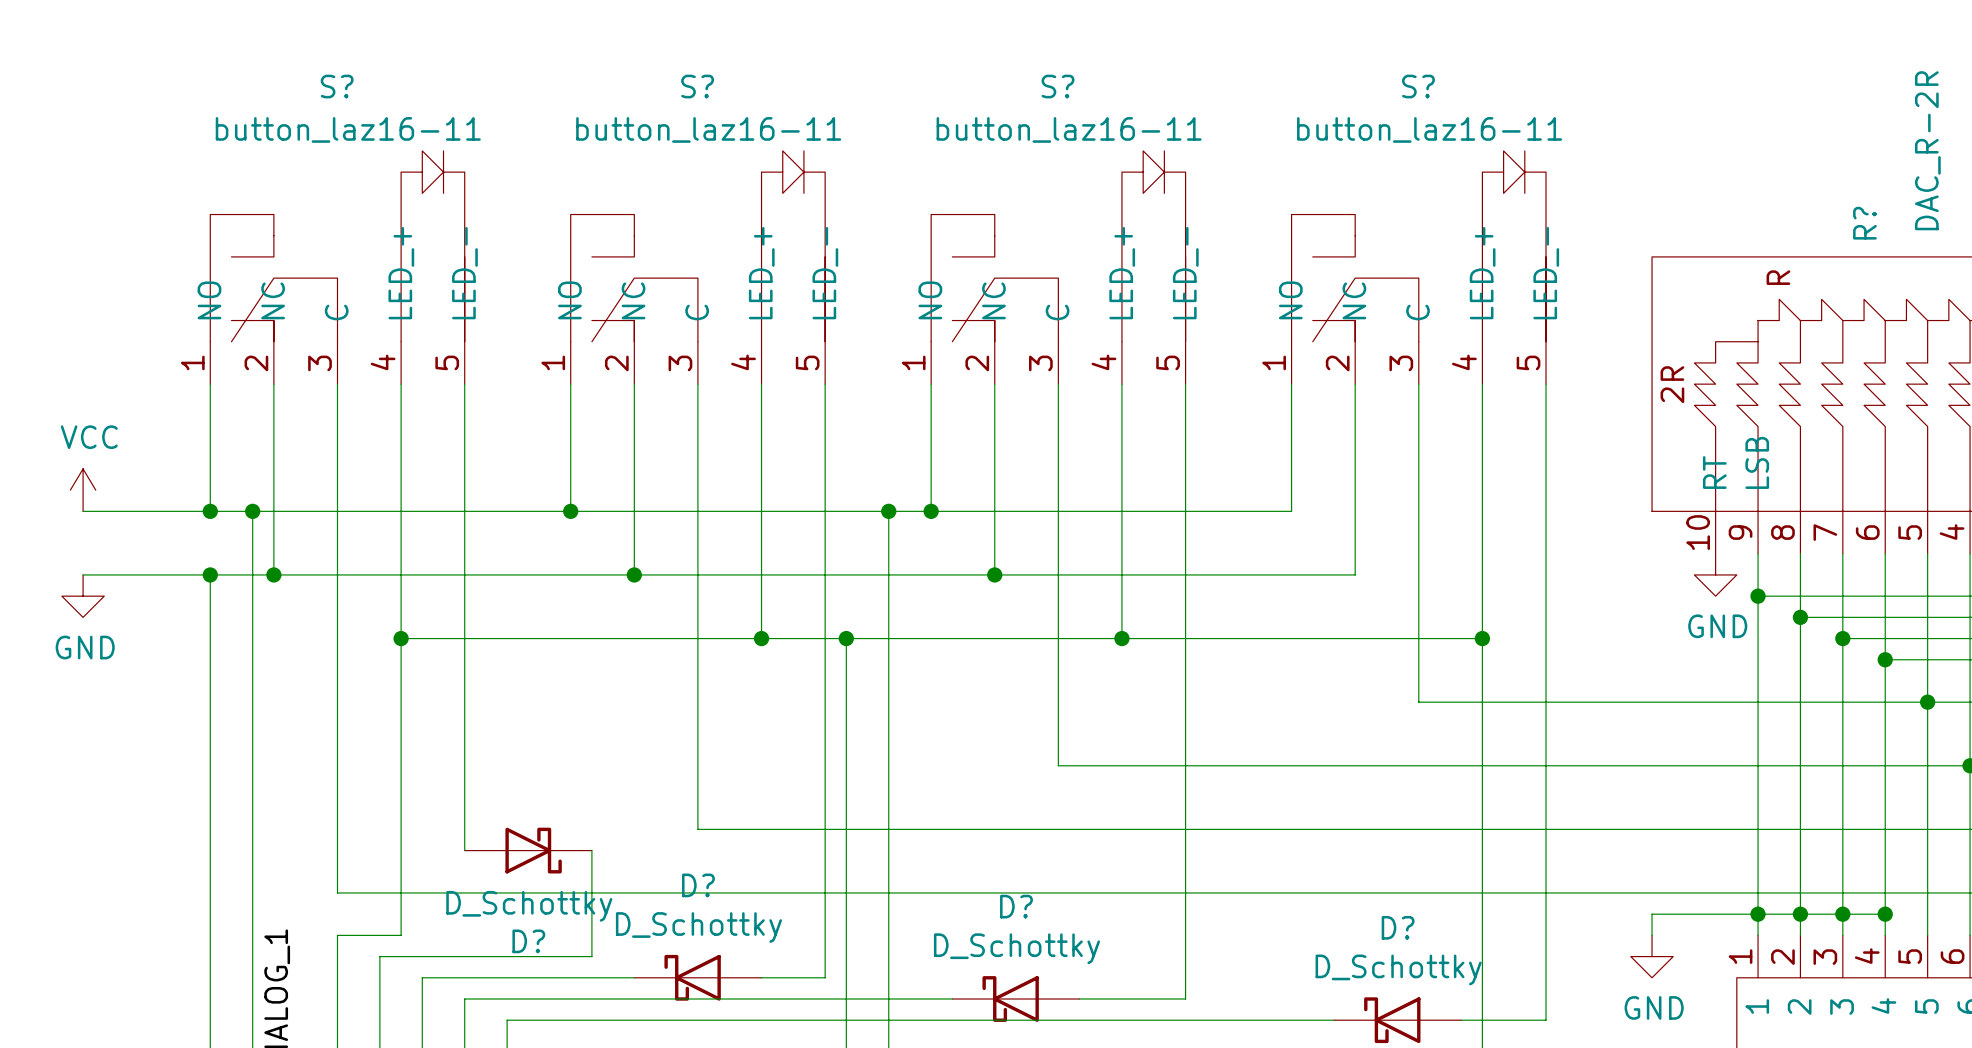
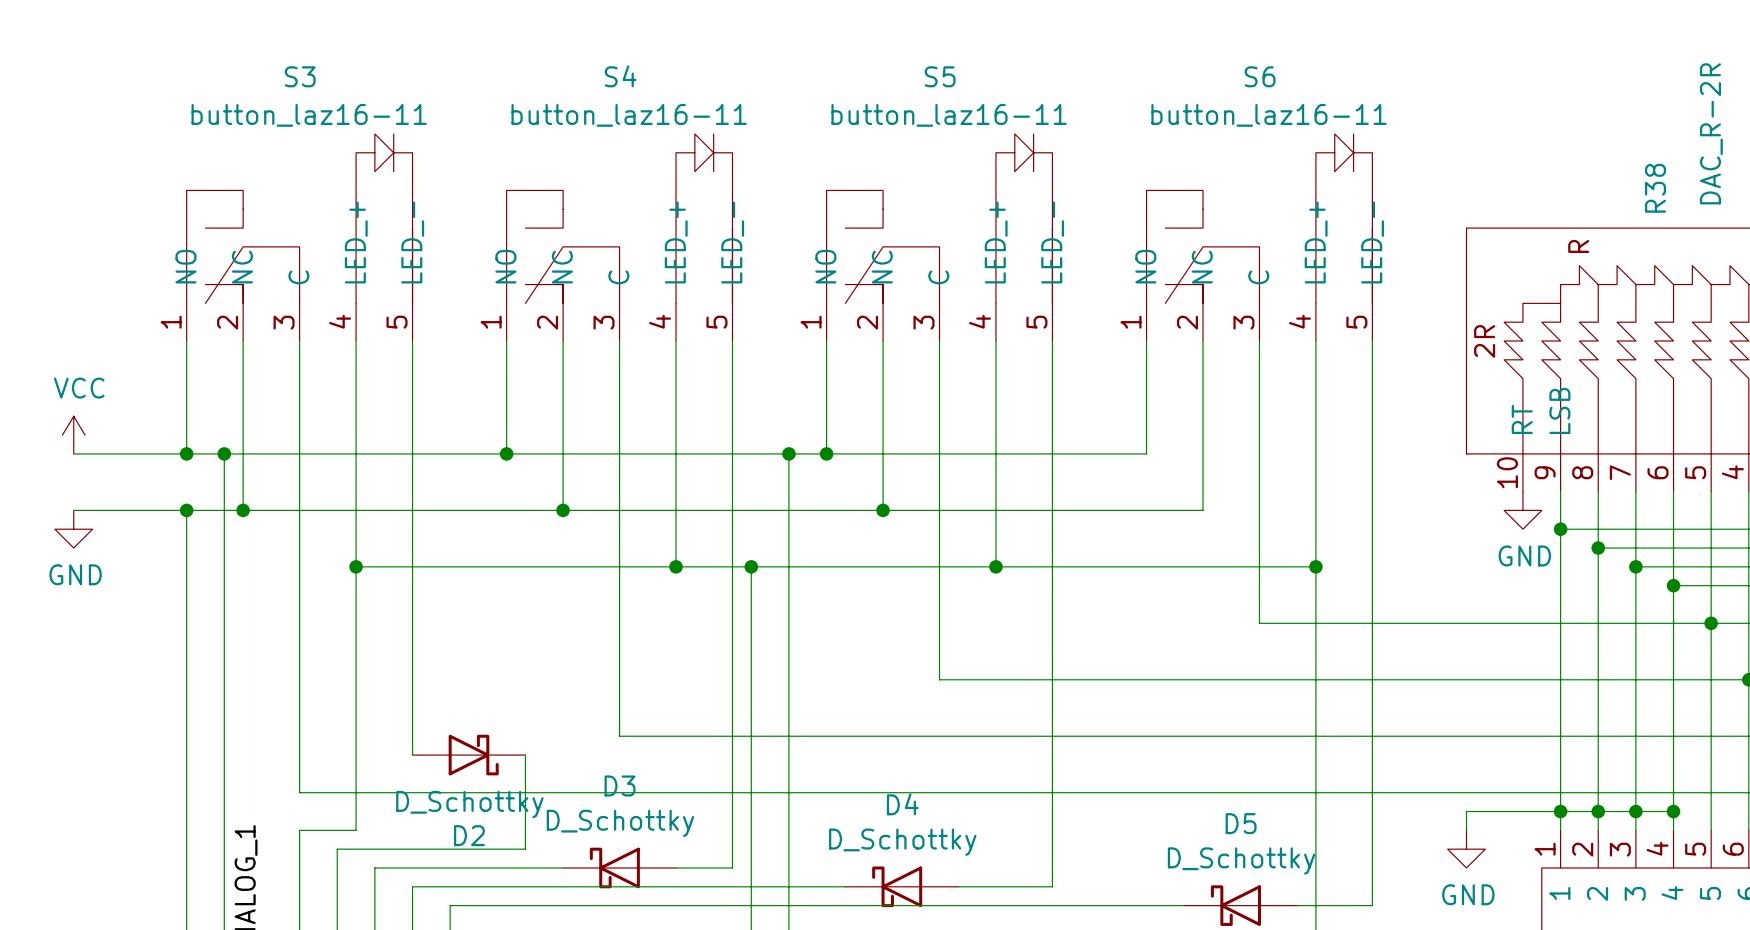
S? name: S? (337, 86) -> S3 (300, 76)
S? name: S? (697, 86) -> S4 (620, 76)
S? name: S? (1058, 86) -> S5 (940, 76)
S? name: S? (1418, 86) -> S6 (1260, 76)
R? name: R? (1864, 223) -> R38 (1655, 188)
D? name: D? (698, 885) -> D3 (620, 785)
D? name: D? (1016, 906) -> D4 (902, 804)
D? name: D? (1398, 927) -> D5 (1241, 823)
D? name: D? (528, 941) -> D2 (469, 835)

